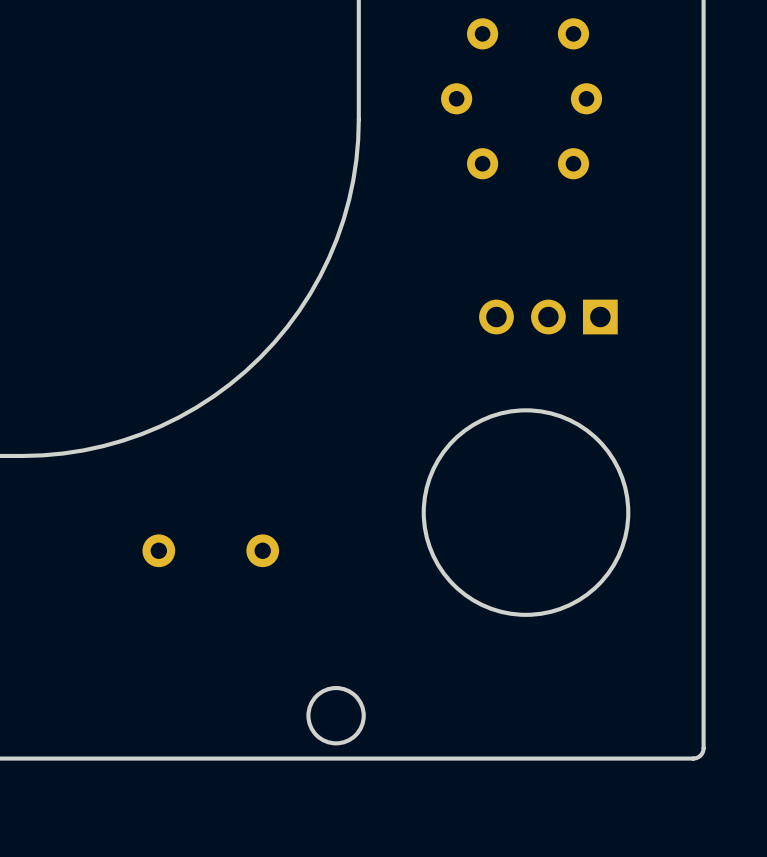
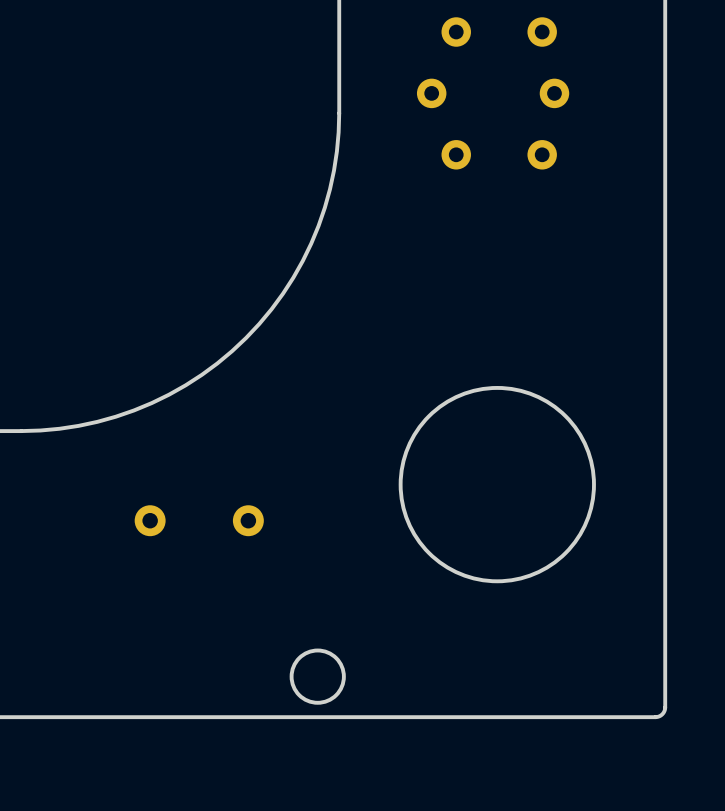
part: (548, 317) -> none

